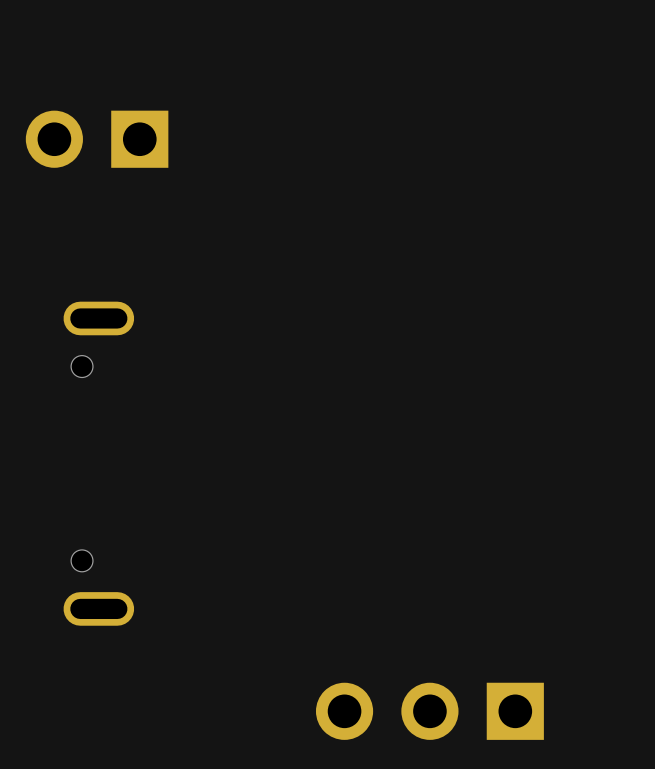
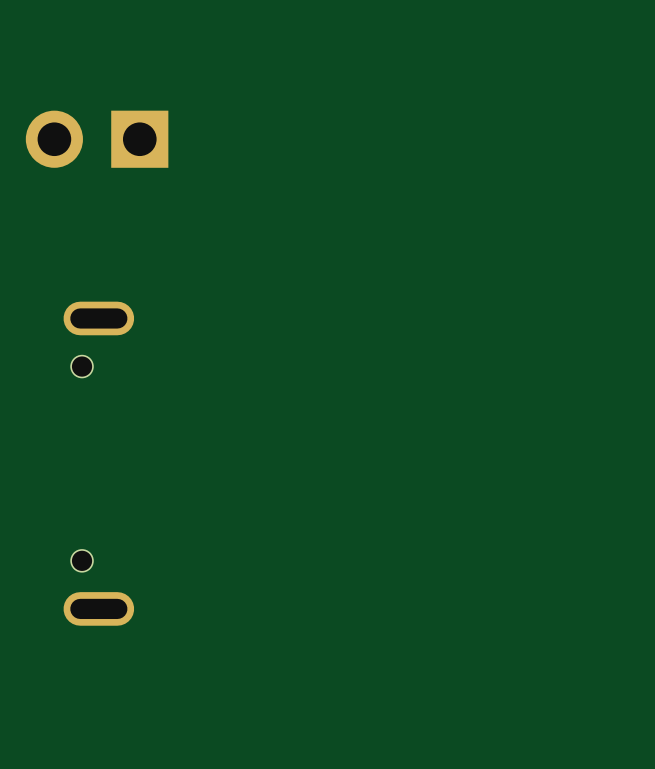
part: (429, 711) -> none

